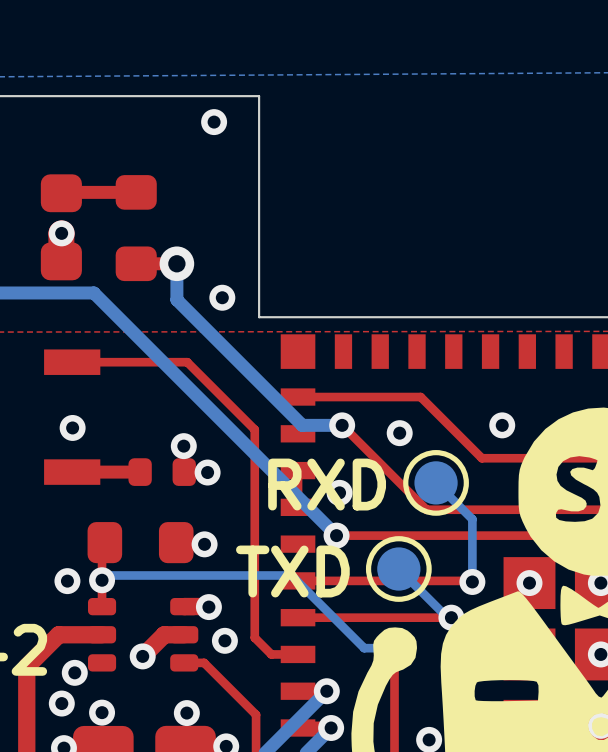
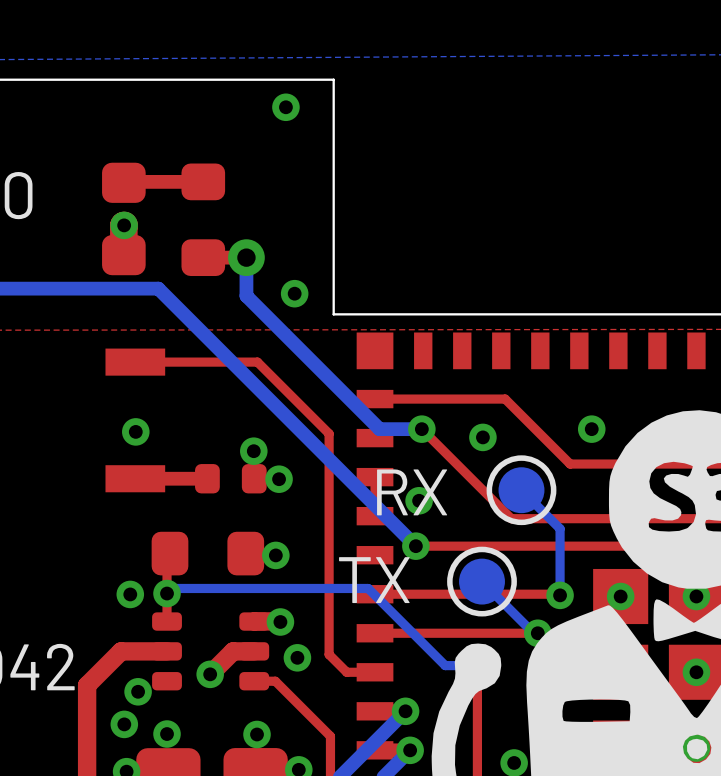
text: RXD (327, 484) -> RX (412, 492)
text: TXD (292, 571) -> TX (374, 580)

